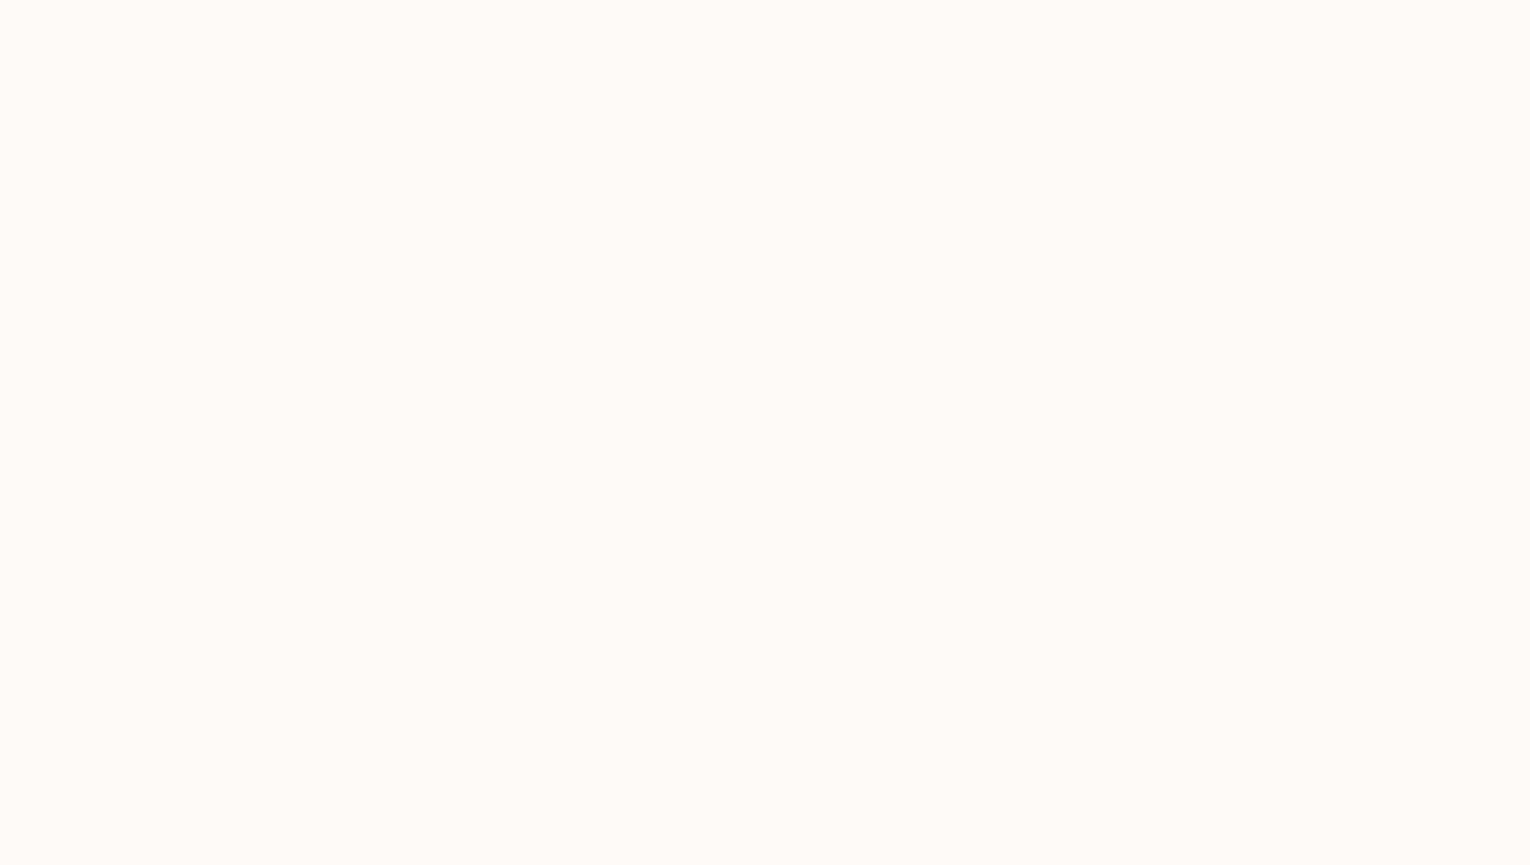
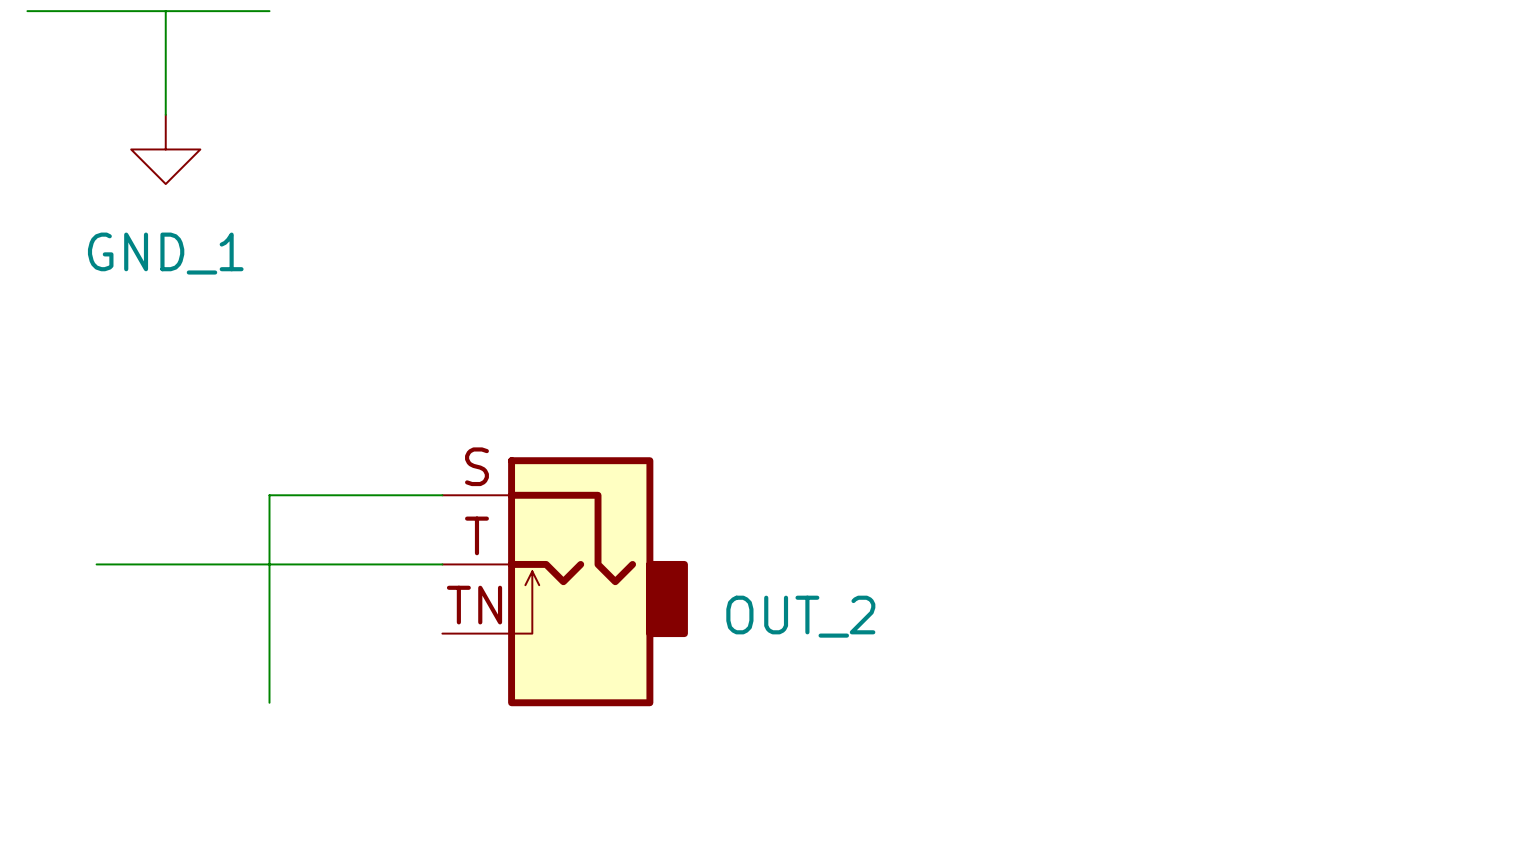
wire: none -> (27, 11) (269, 11)
wire: none -> (165, 11) (165, 114)
power symbol: none -> GND_1 (165, 149)
wire: none -> (442, 495) (269, 495) (269, 702)
wire: none -> (96, 564) (442, 564)
OUT_2: none -> (565, 581)

